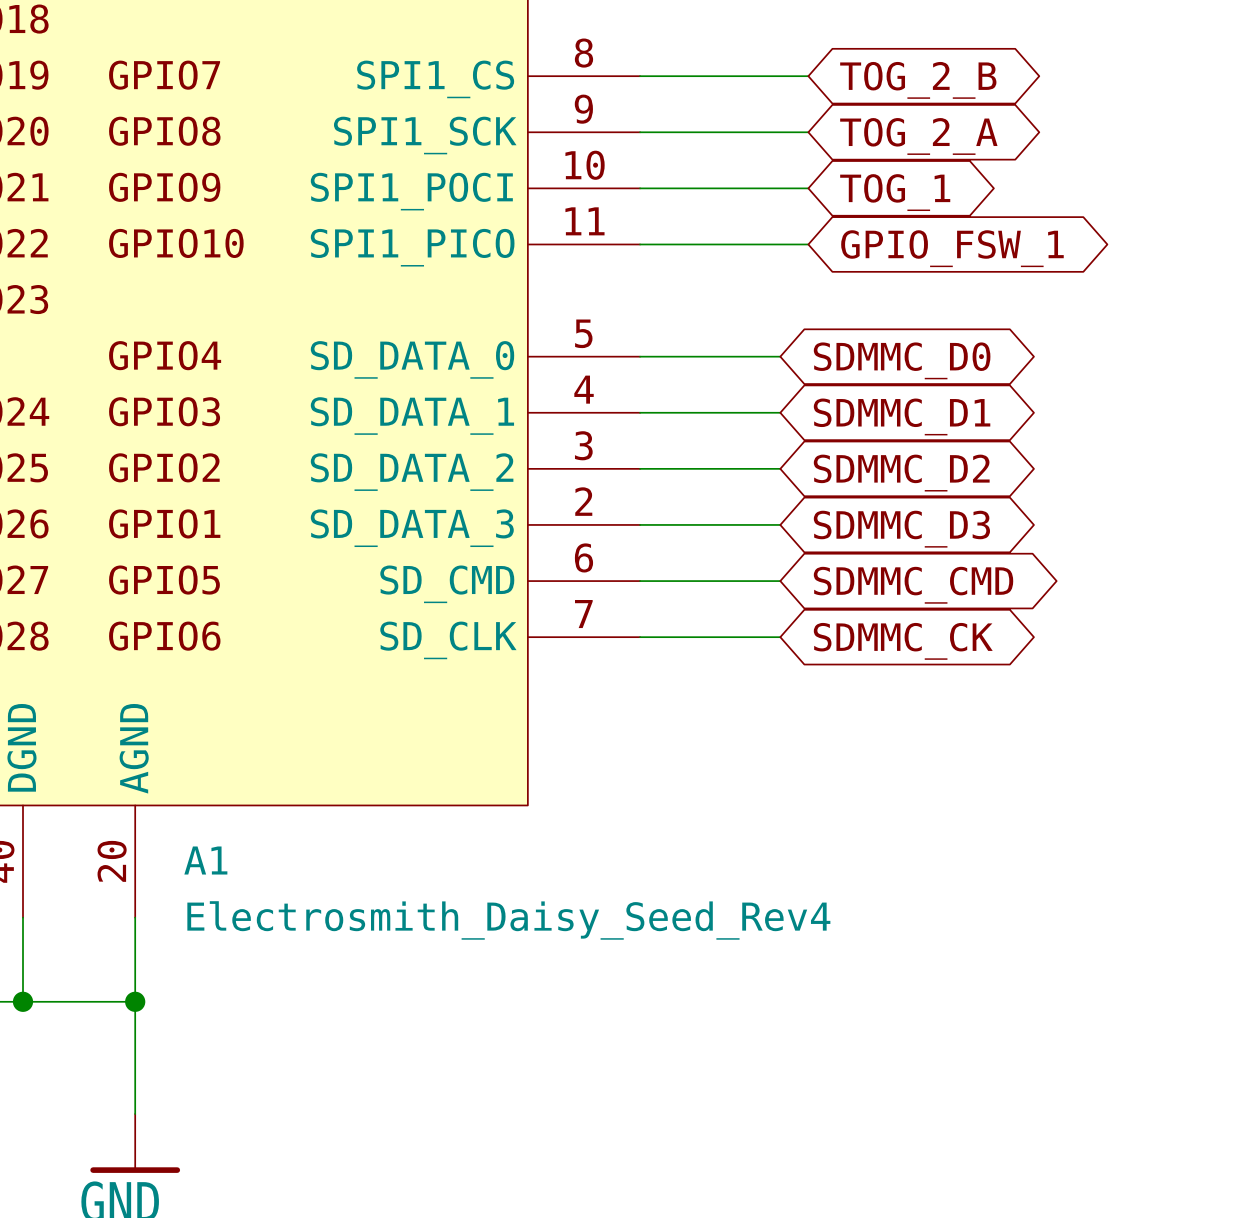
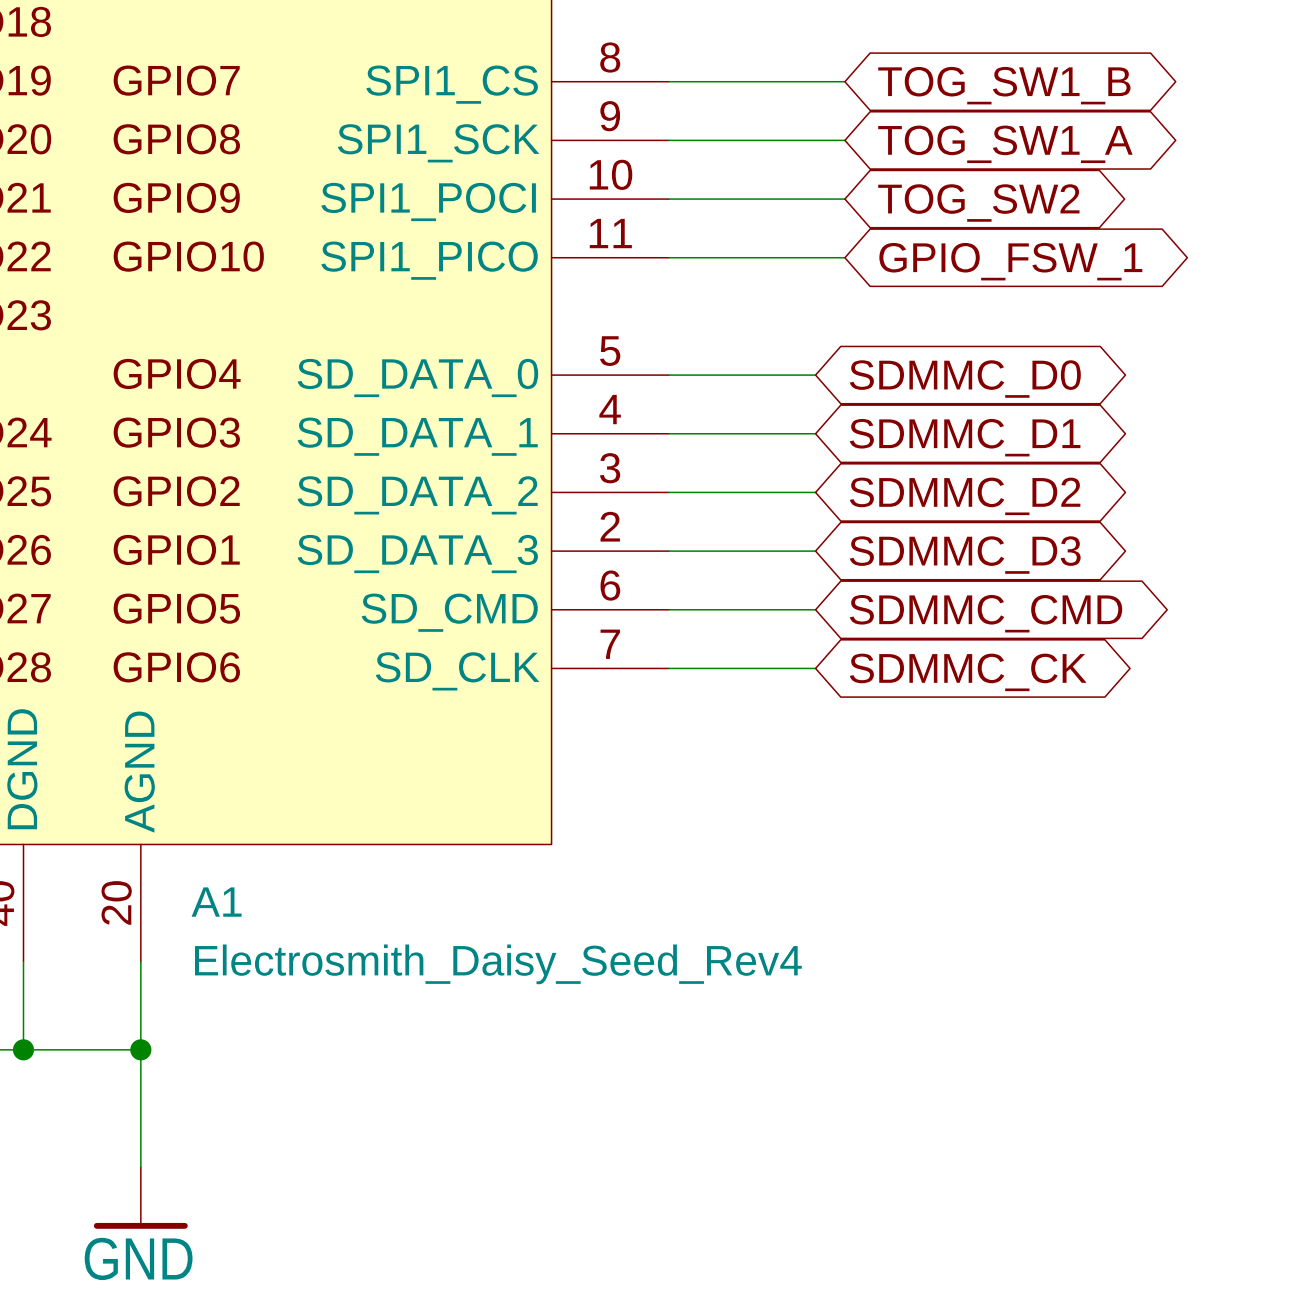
global label: TOG_2_B (918, 80) -> TOG_SW1_B (1004, 85)
global label: TOG_2_A (918, 136) -> TOG_SW1_A (1005, 144)
global label: TOG_1 (895, 192) -> TOG_SW2 (978, 203)

